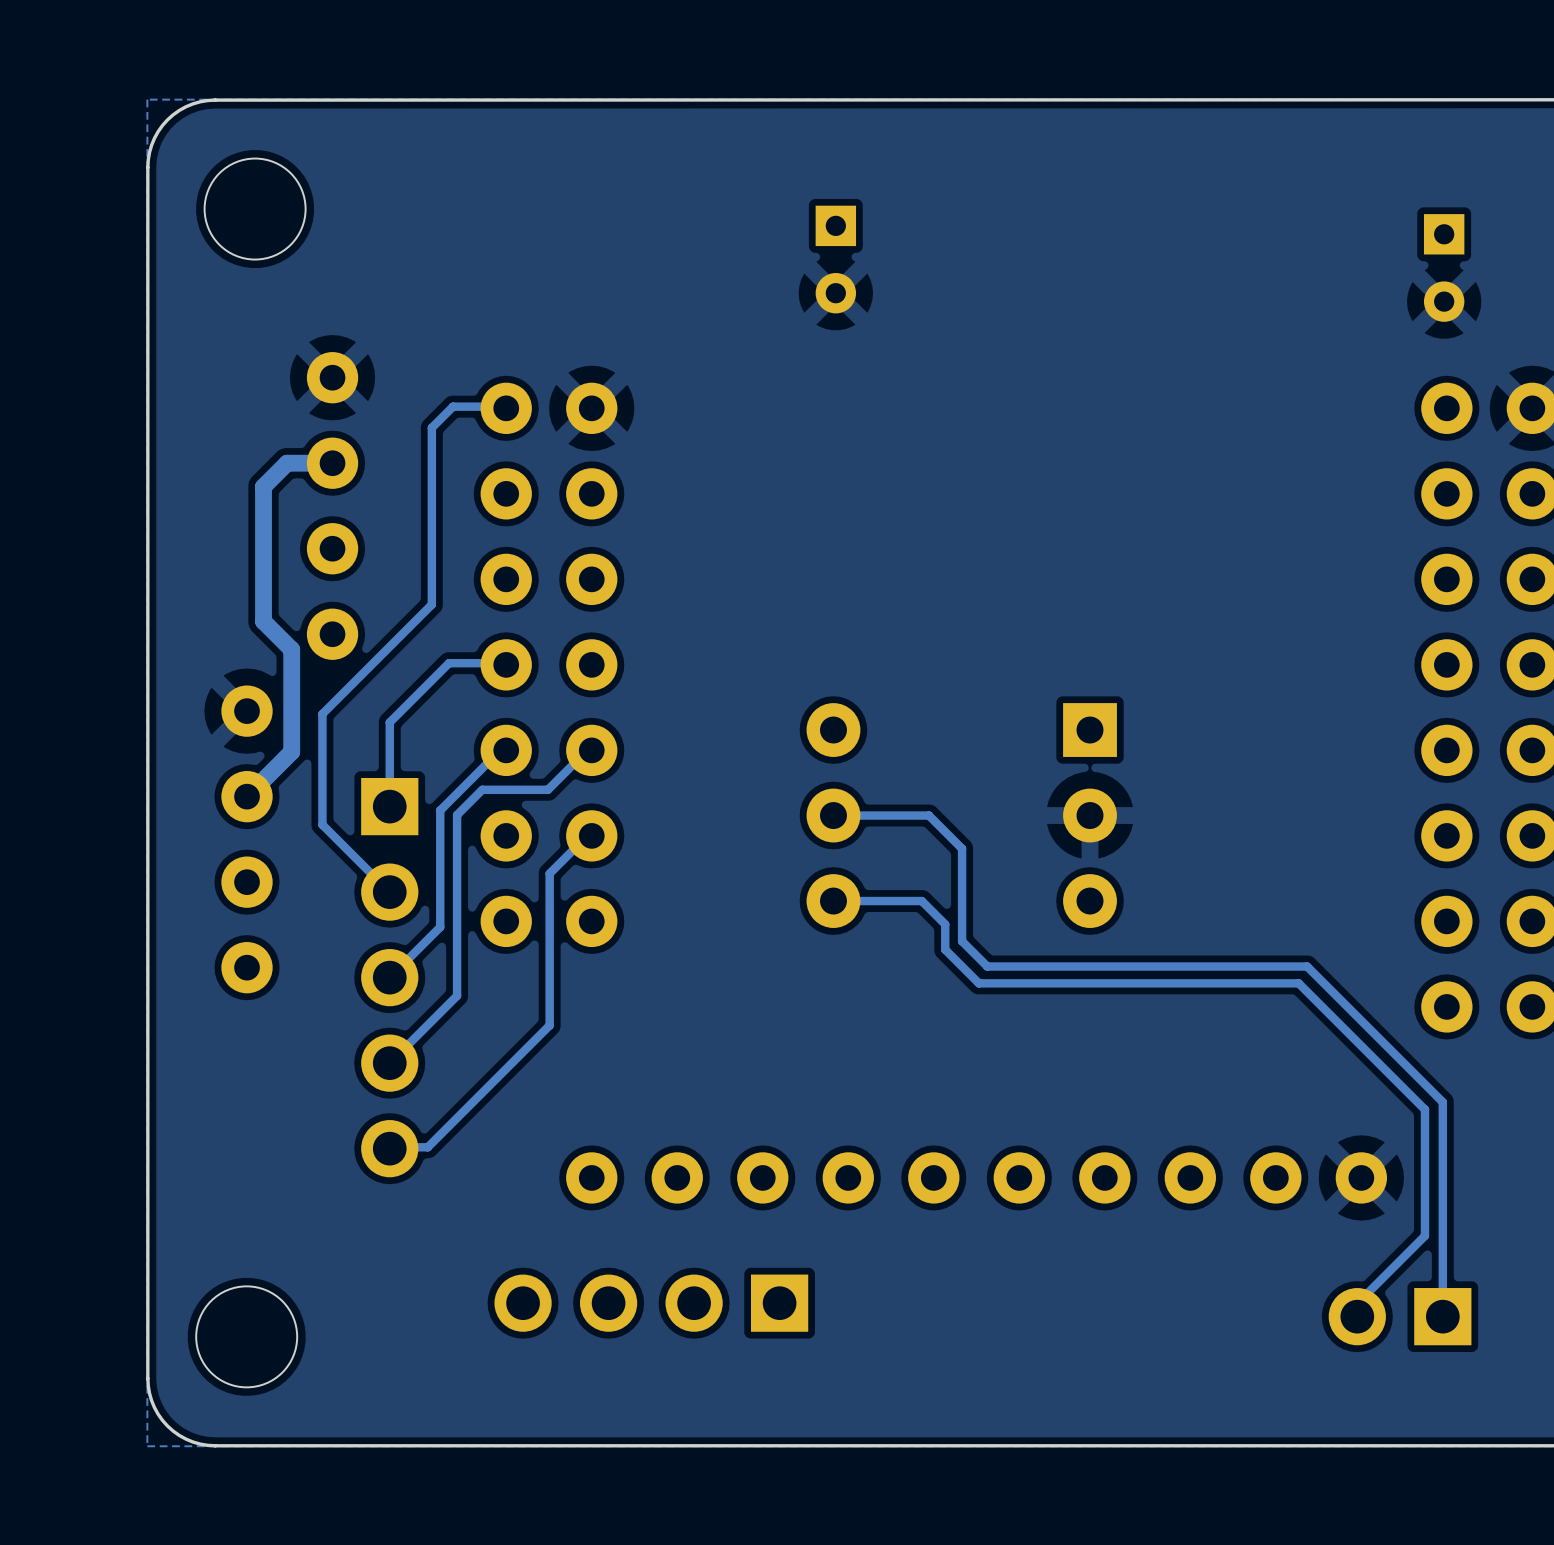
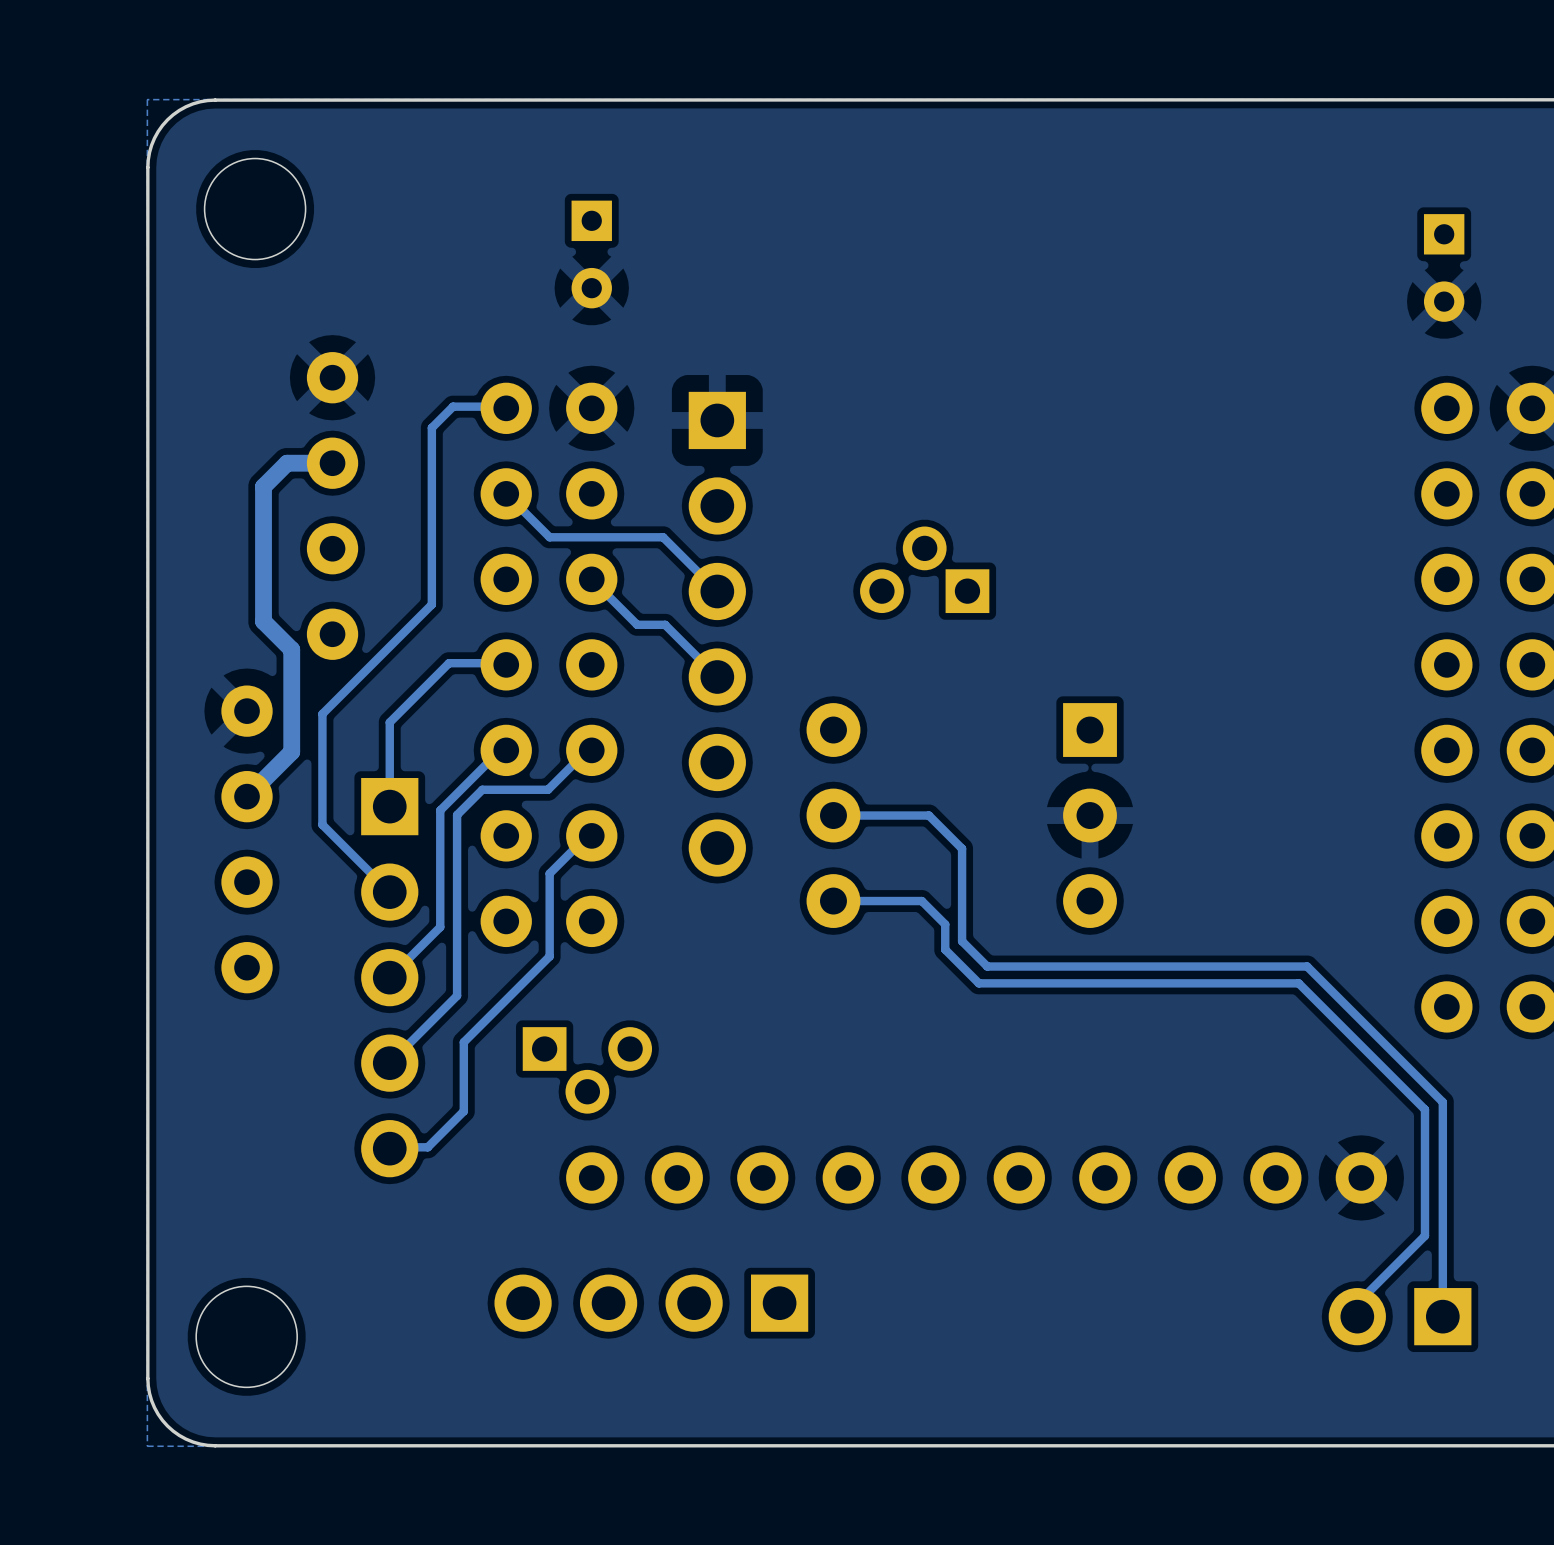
part position: (835, 259) -> (591, 254)
track: none -> (506, 493) (549, 537) (663, 537) (717, 591)
part: none -> (924, 569)
track: none -> (591, 579) (637, 624) (665, 624) (717, 676)
part: none -> (717, 634)
track: (549, 956) (549, 1025) (463, 1111) -> (549, 956) (463, 1042) (463, 1111)
part: none -> (587, 1070)

